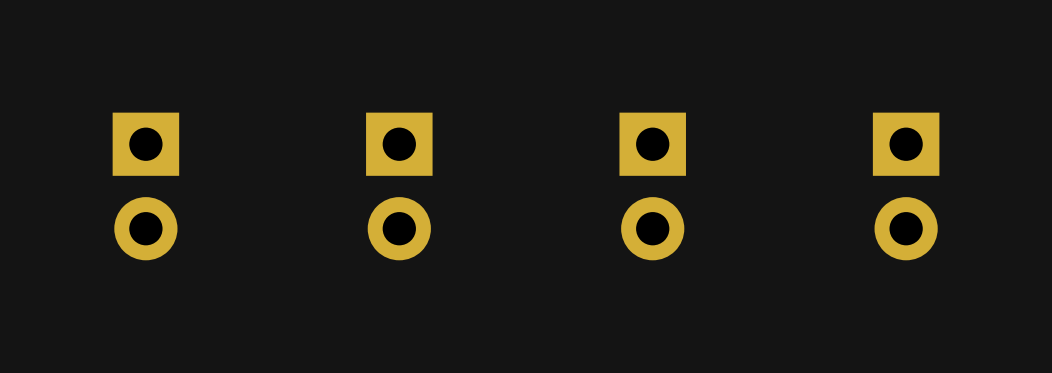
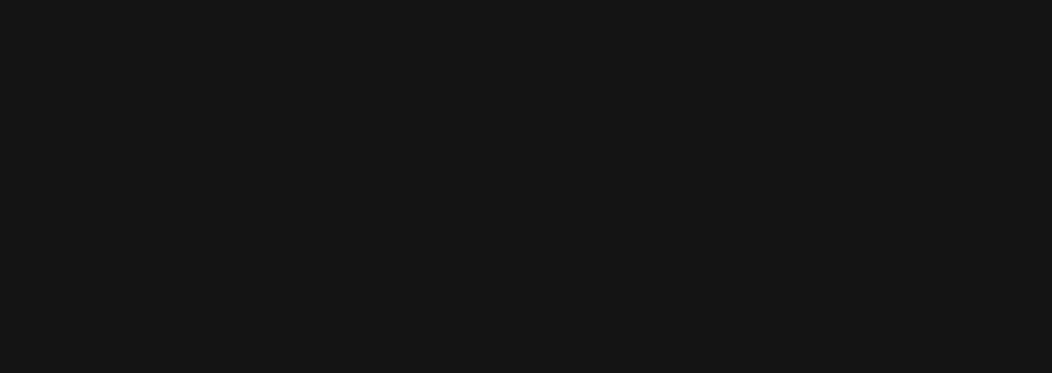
part: (145, 186) -> none
part: (399, 186) -> none
part: (652, 186) -> none
part: (906, 186) -> none

